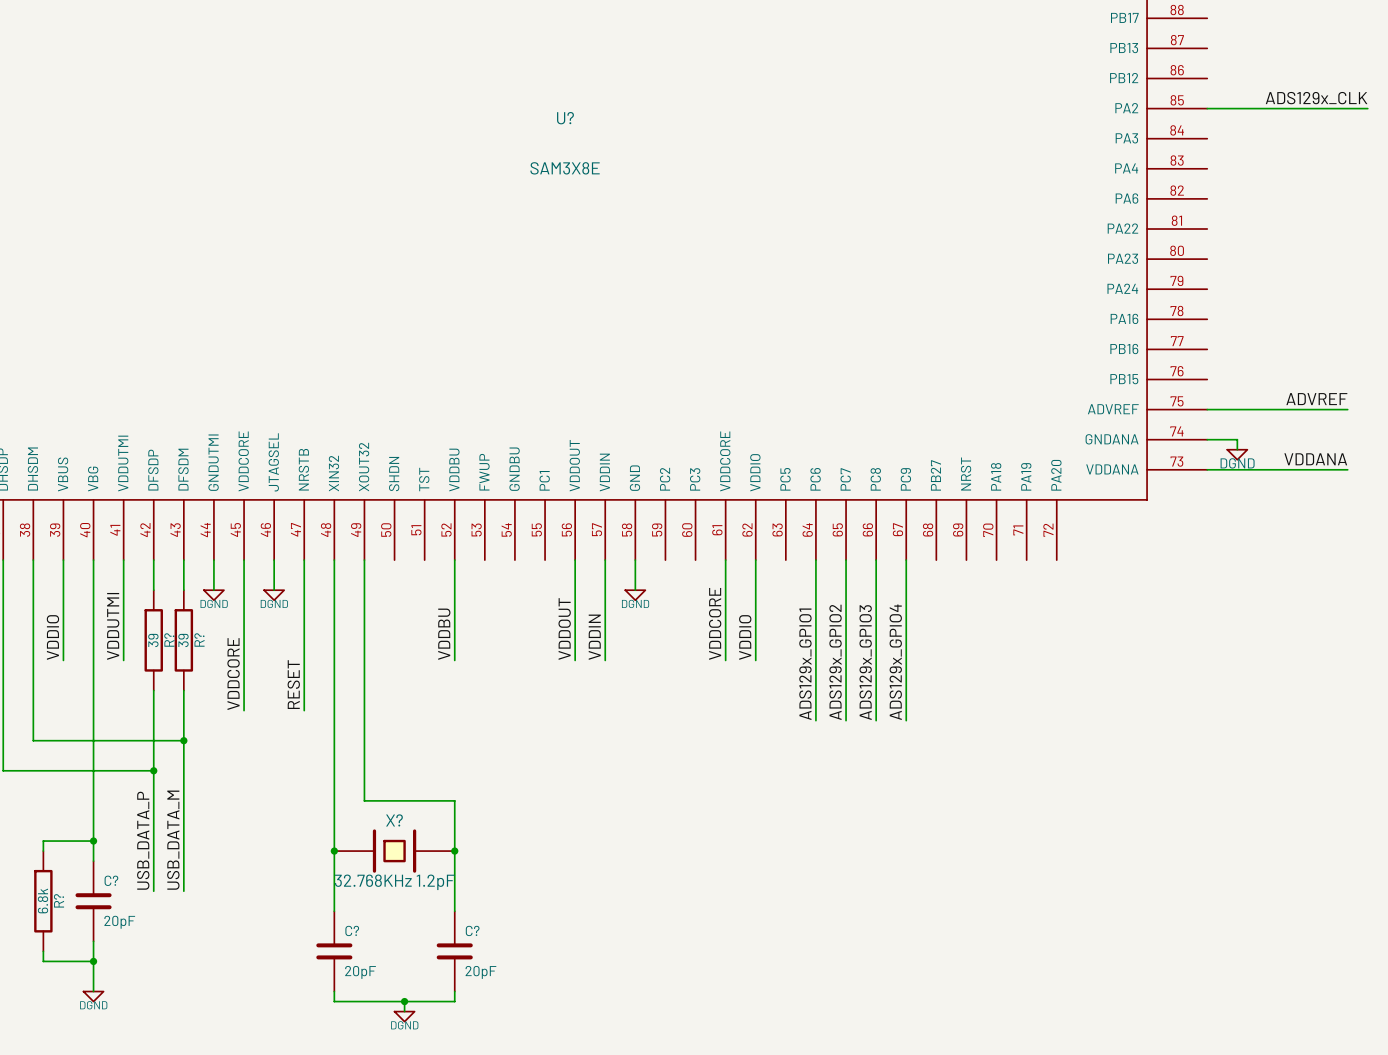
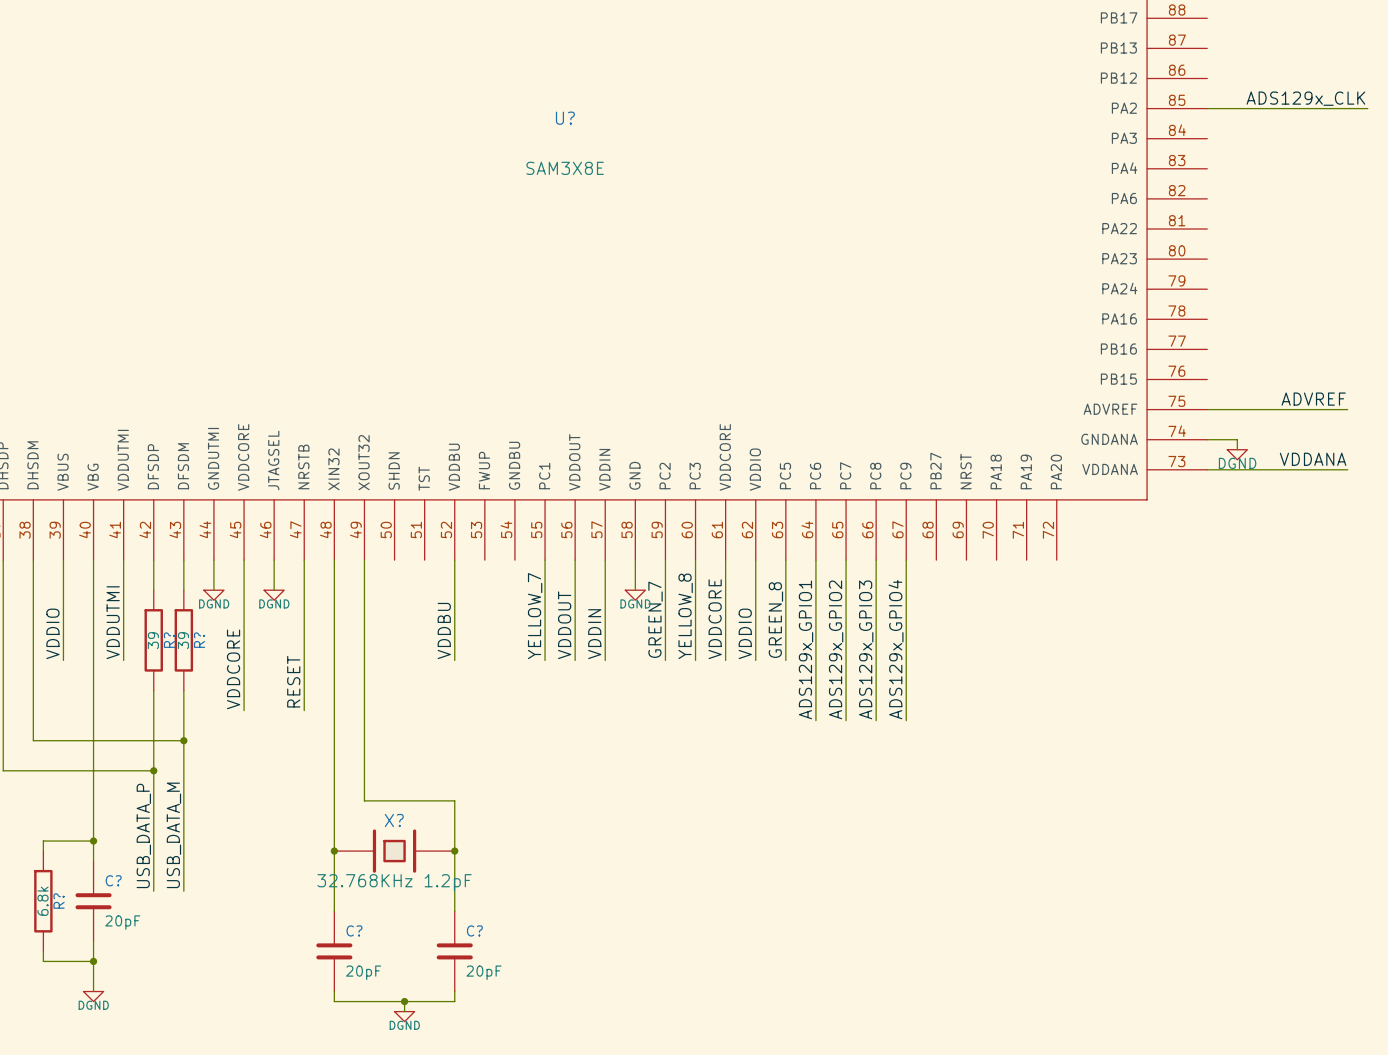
wire: none -> (545, 560) (545, 660)
wire: none -> (665, 560) (665, 660)
wire: none -> (695, 560) (695, 660)
wire: none -> (785, 560) (785, 660)
label: none -> YELLOW_7 (535, 616)
label: none -> YELLOW_8 (685, 616)
label: none -> GREEN_8 (775, 620)
label: none -> GREEN_7 (655, 619)

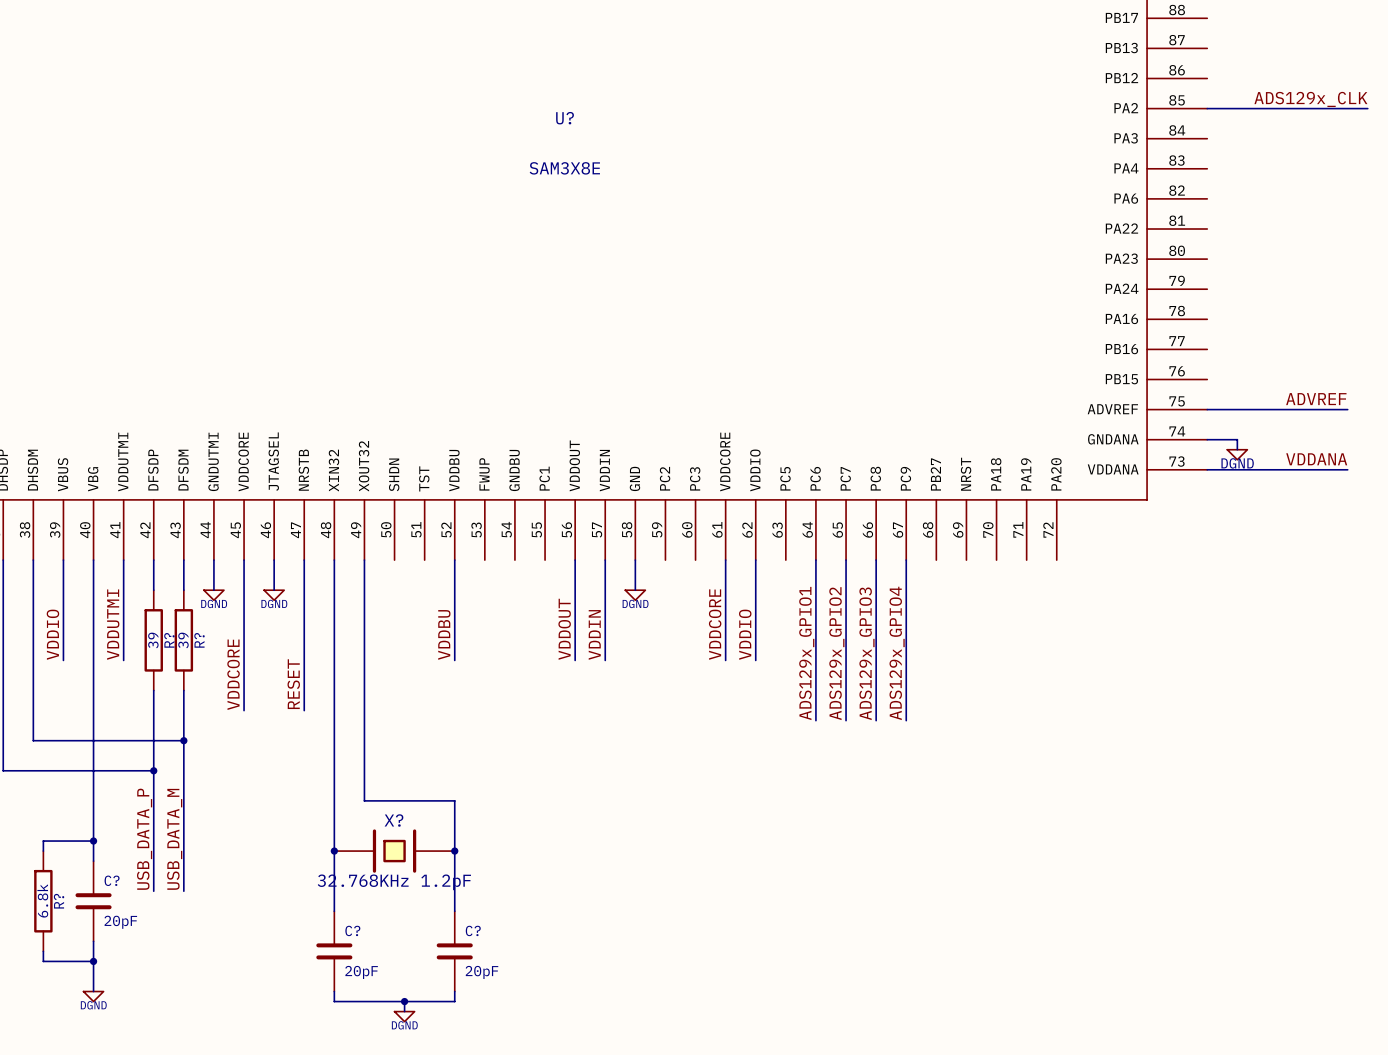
wire: (545, 560) (545, 660) -> none
wire: (665, 560) (665, 660) -> none
wire: (695, 560) (695, 660) -> none
wire: (785, 560) (785, 660) -> none
label: YELLOW_7 (535, 616) -> none
label: YELLOW_8 (685, 616) -> none
label: GREEN_7 (655, 619) -> none
label: GREEN_8 (775, 620) -> none

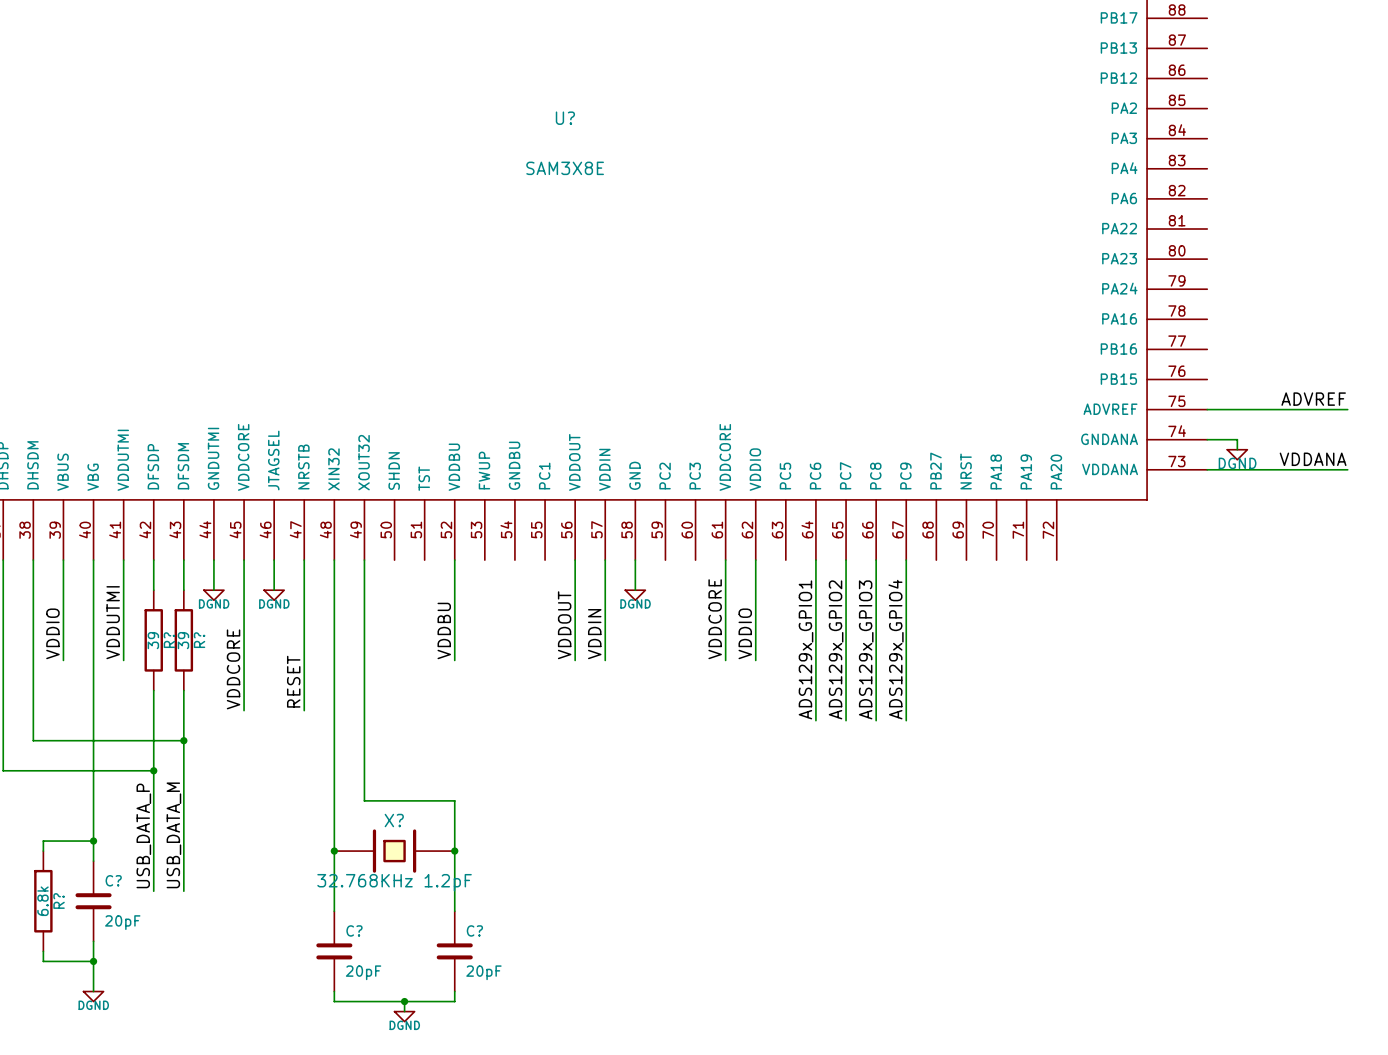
label: ADS129x_CLK (1310, 99) -> none
wire: (1207, 108) (1367, 108) -> none

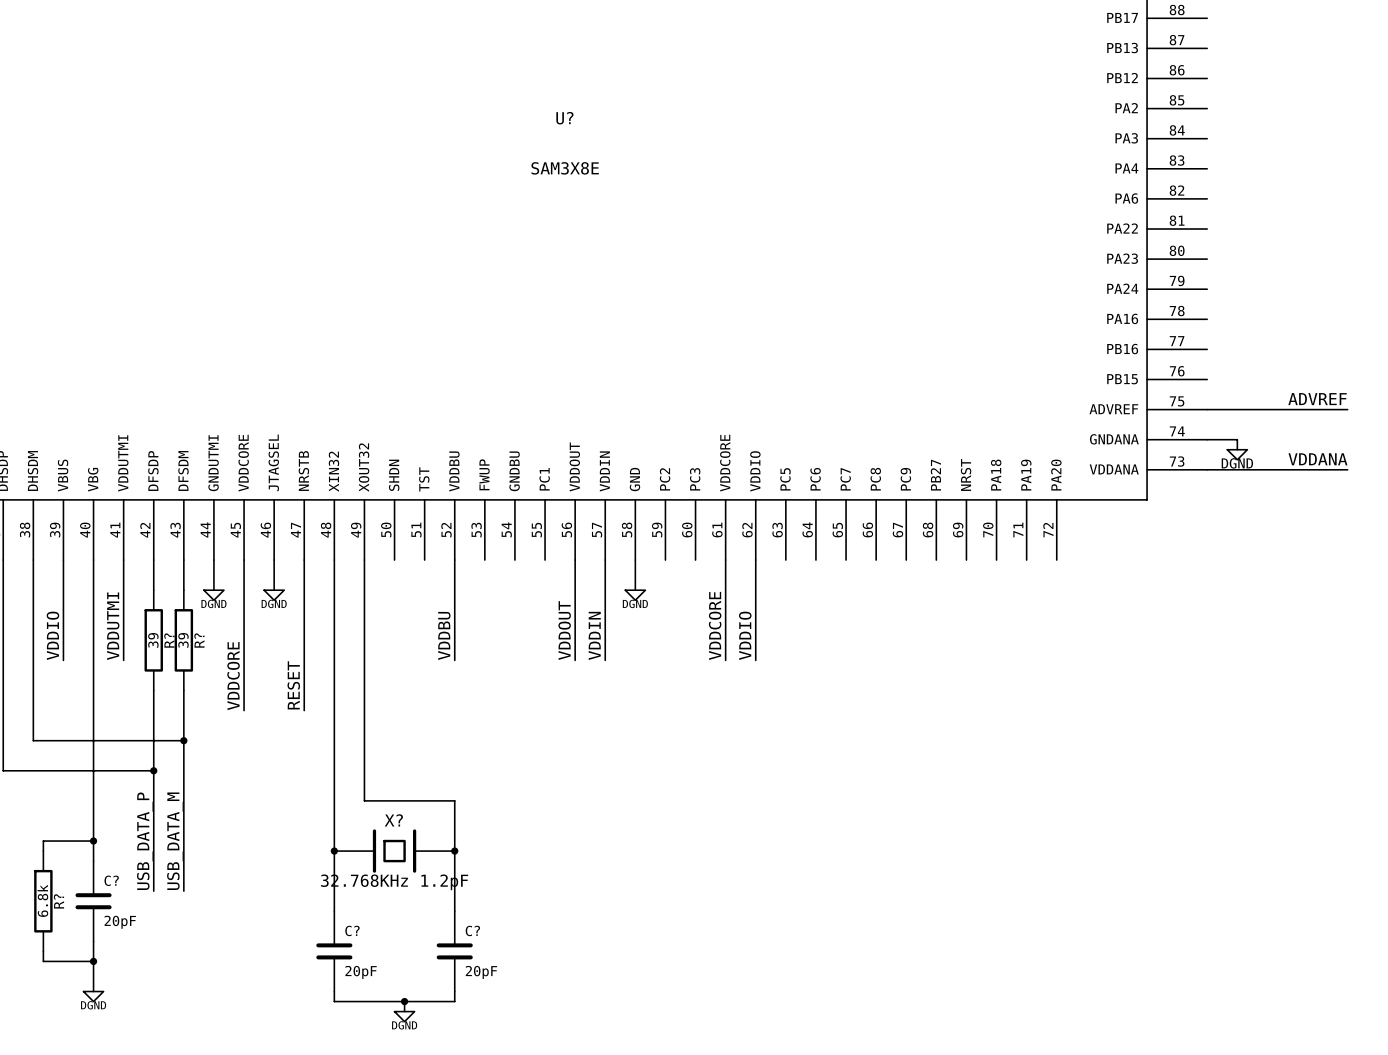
wire: (815, 560) (815, 720) -> none
wire: (846, 560) (846, 720) -> none
wire: (876, 560) (876, 720) -> none
wire: (906, 560) (906, 720) -> none
label: ADS129x_GPIO1 (806, 649) -> none
label: ADS129x_GPIO2 (836, 649) -> none
label: ADS129x_GPIO3 (866, 649) -> none
label: ADS129x_GPIO4 (896, 649) -> none

